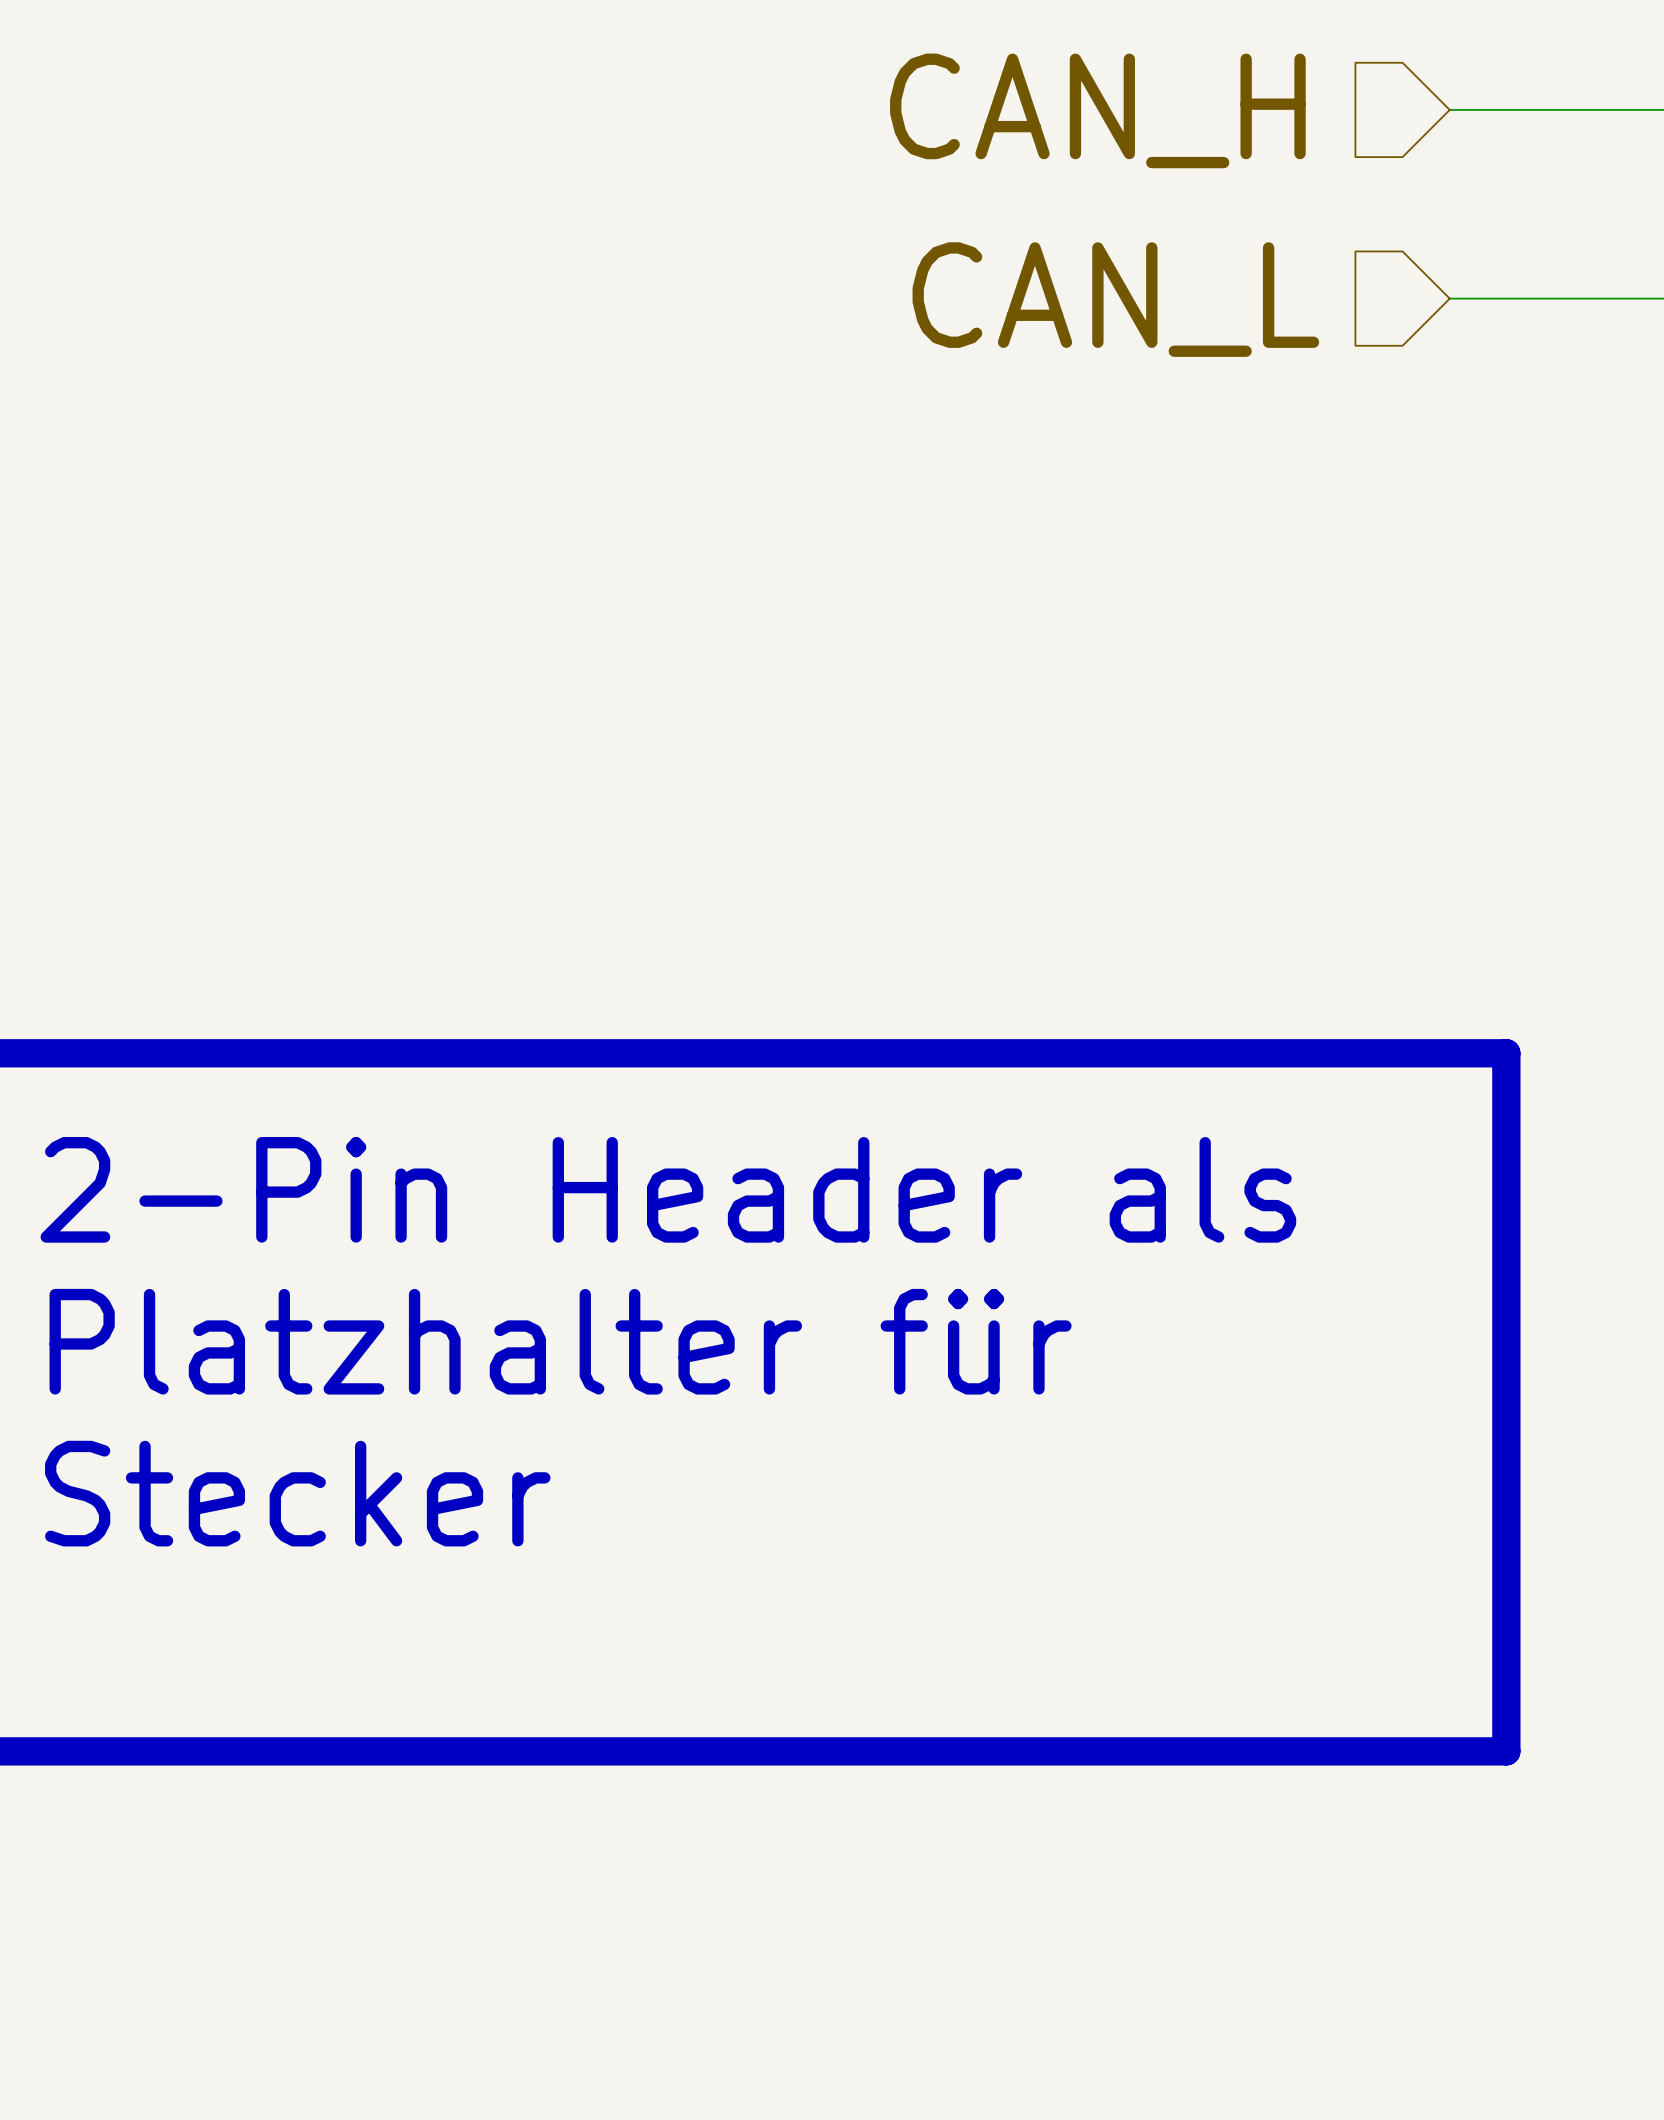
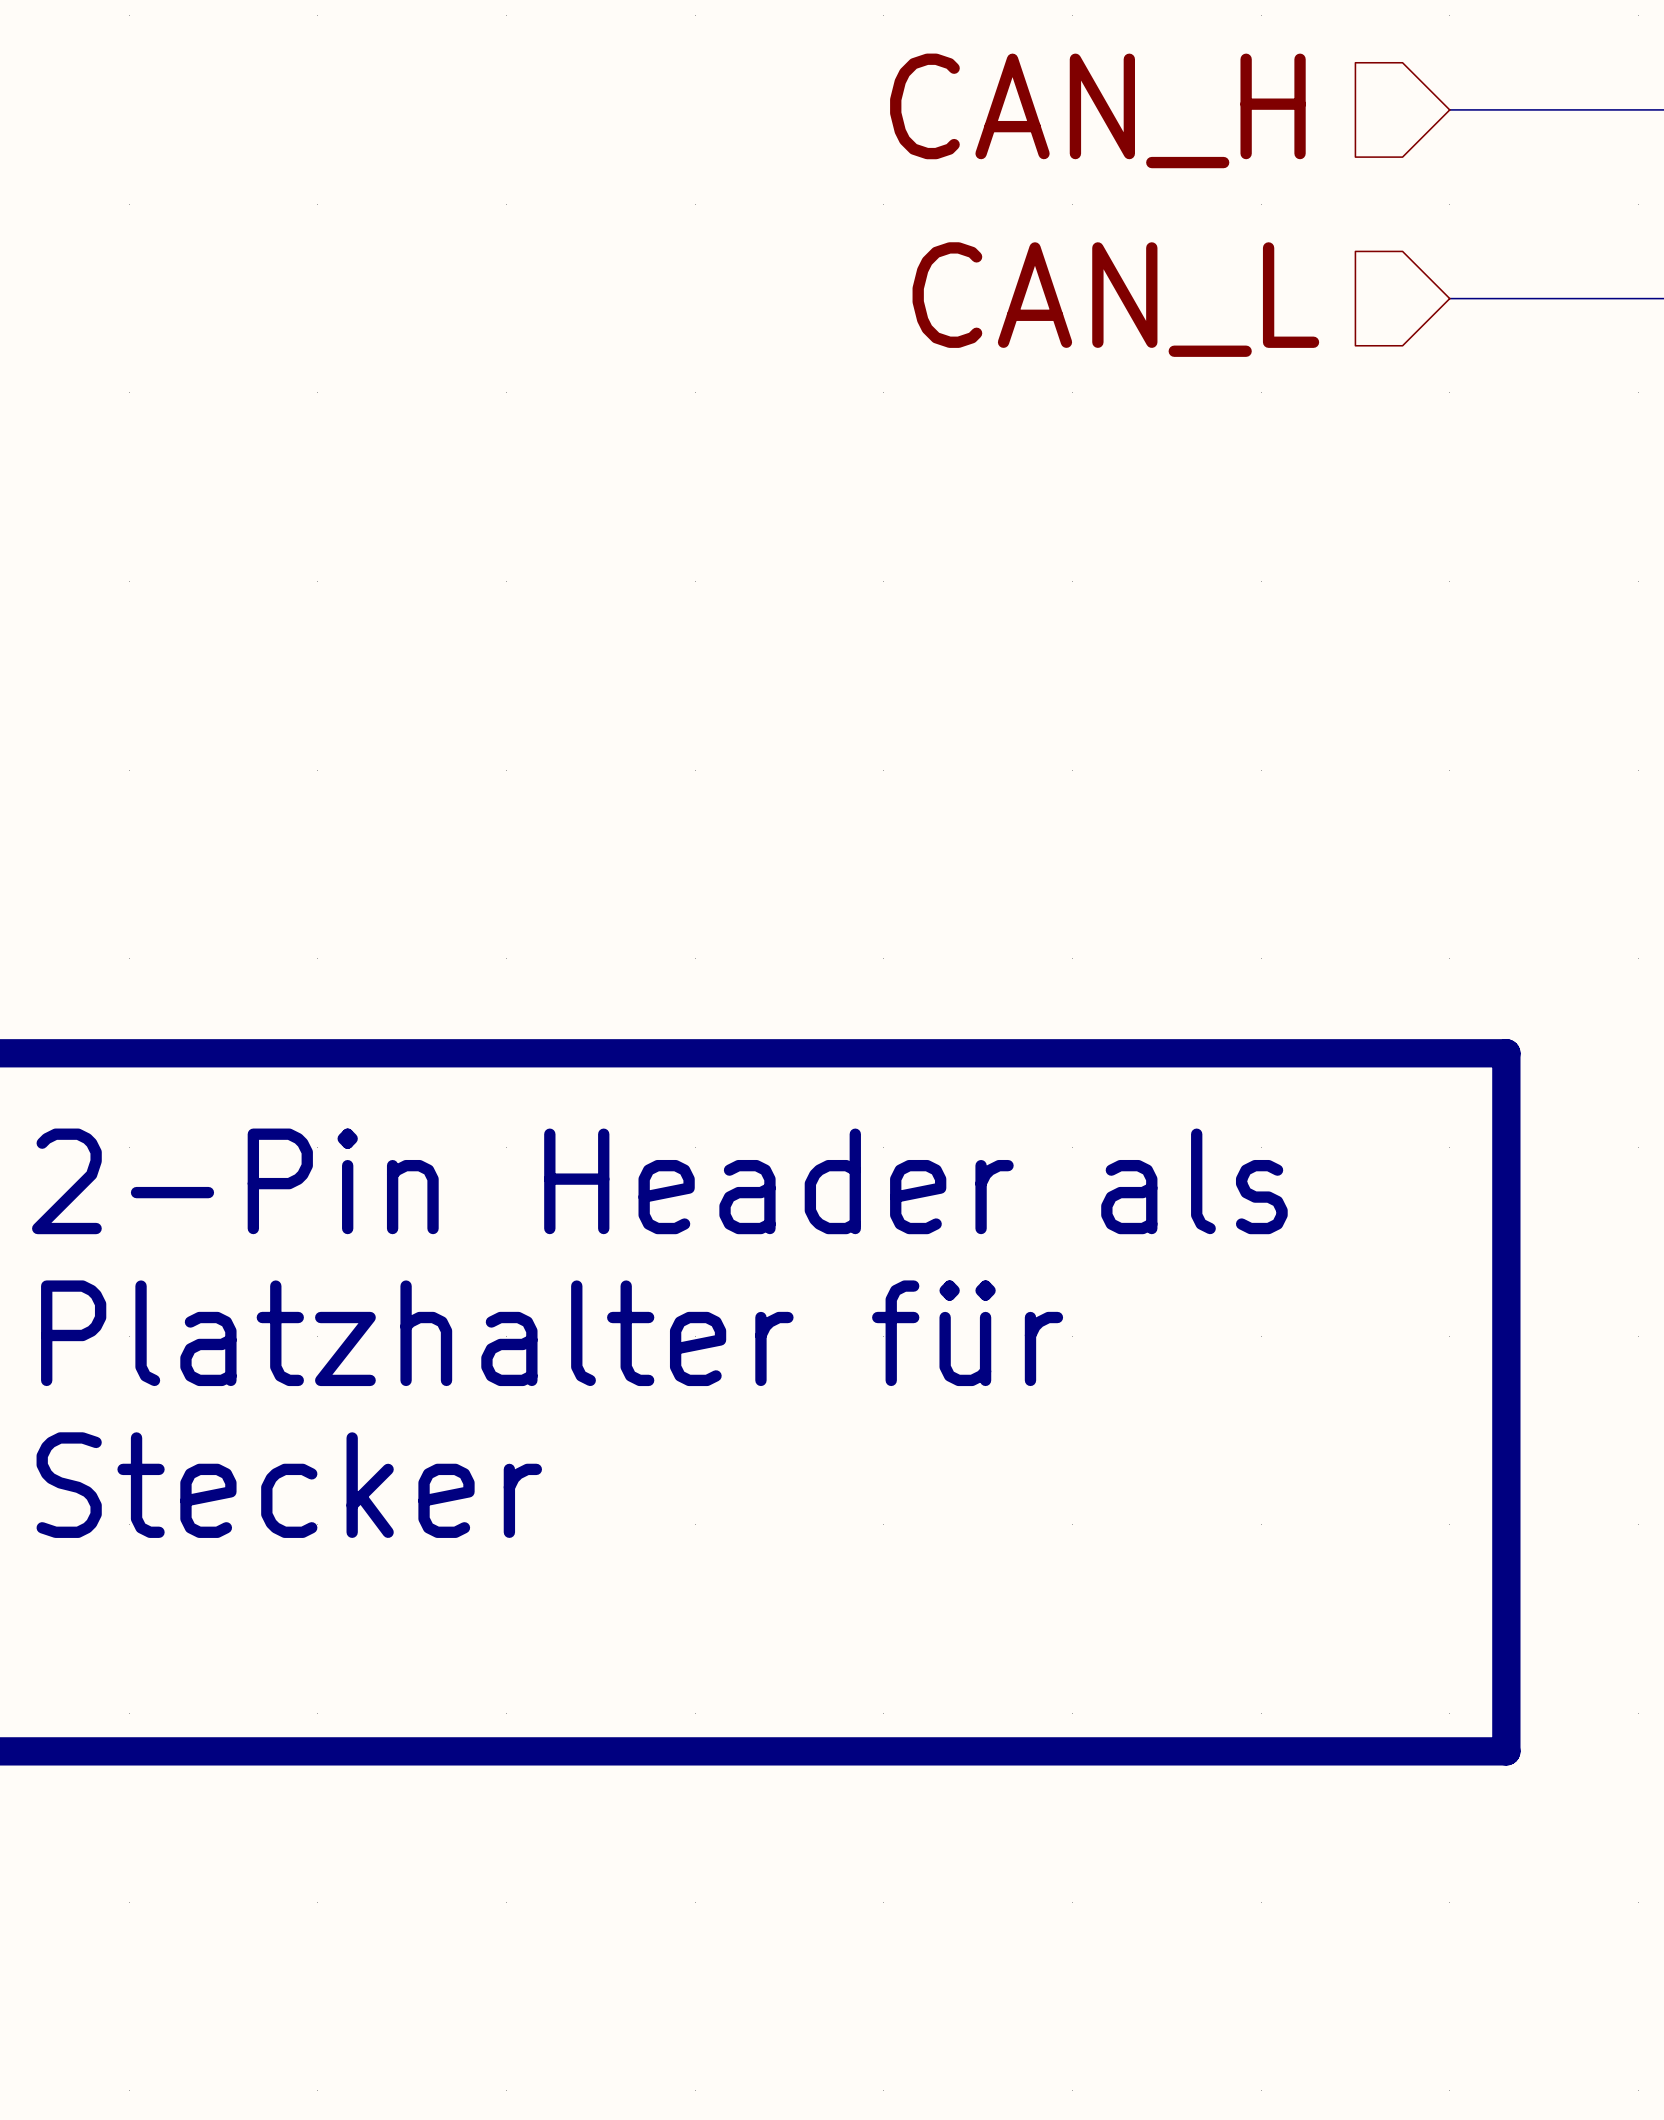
text position: 2-Pin Header als (668, 1189) -> 2-Pin Header als (659, 1181)
text position: Platzhalter für (560, 1341) -> Platzhalter für (552, 1333)
text position: Stecker (297, 1493) -> Stecker (289, 1485)

